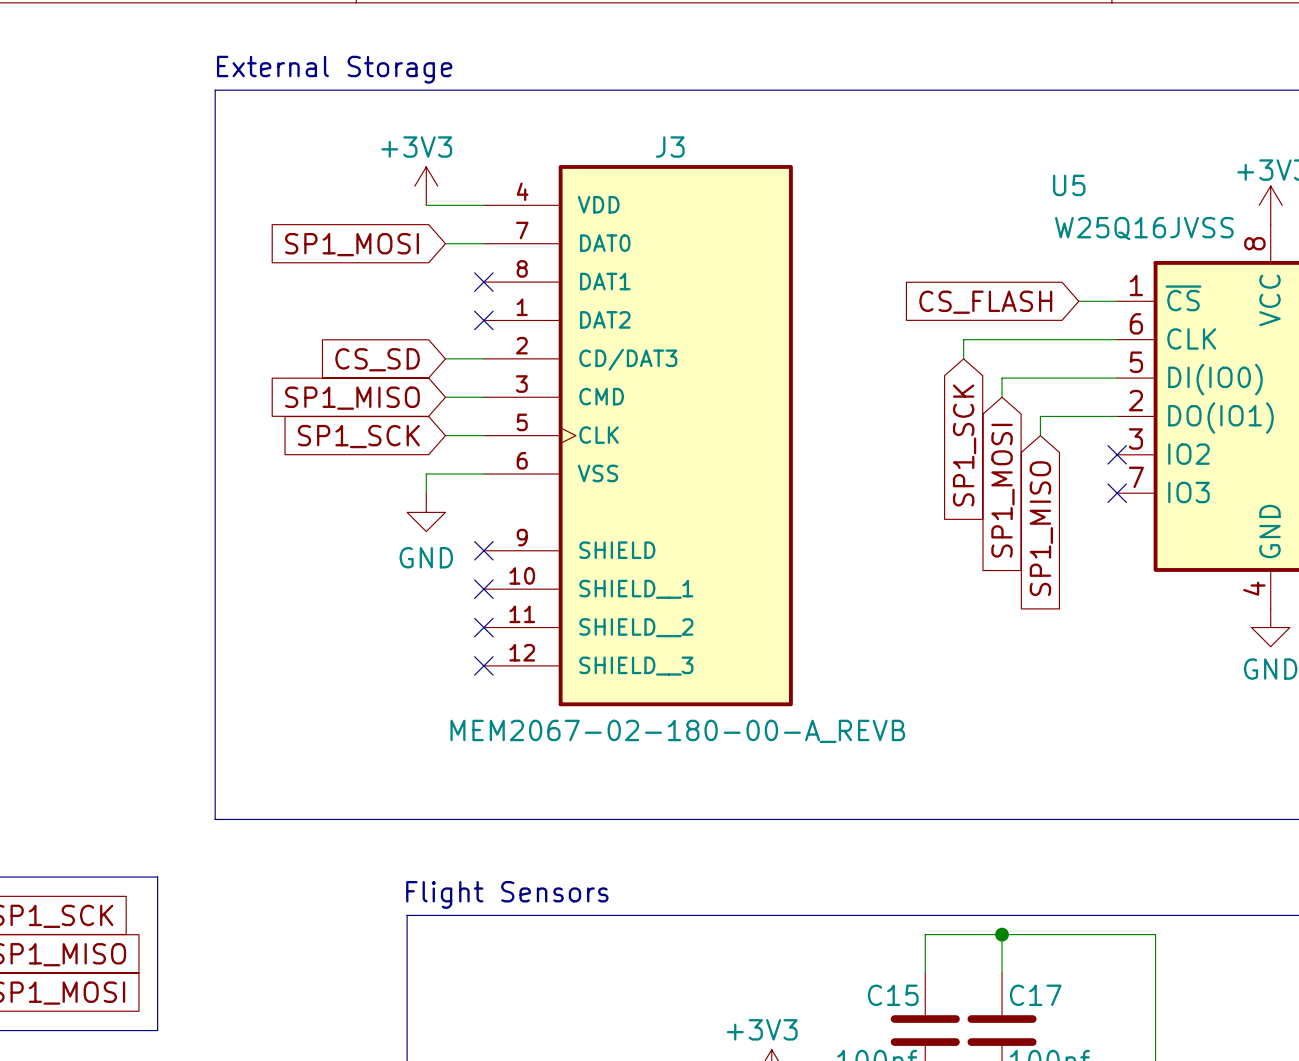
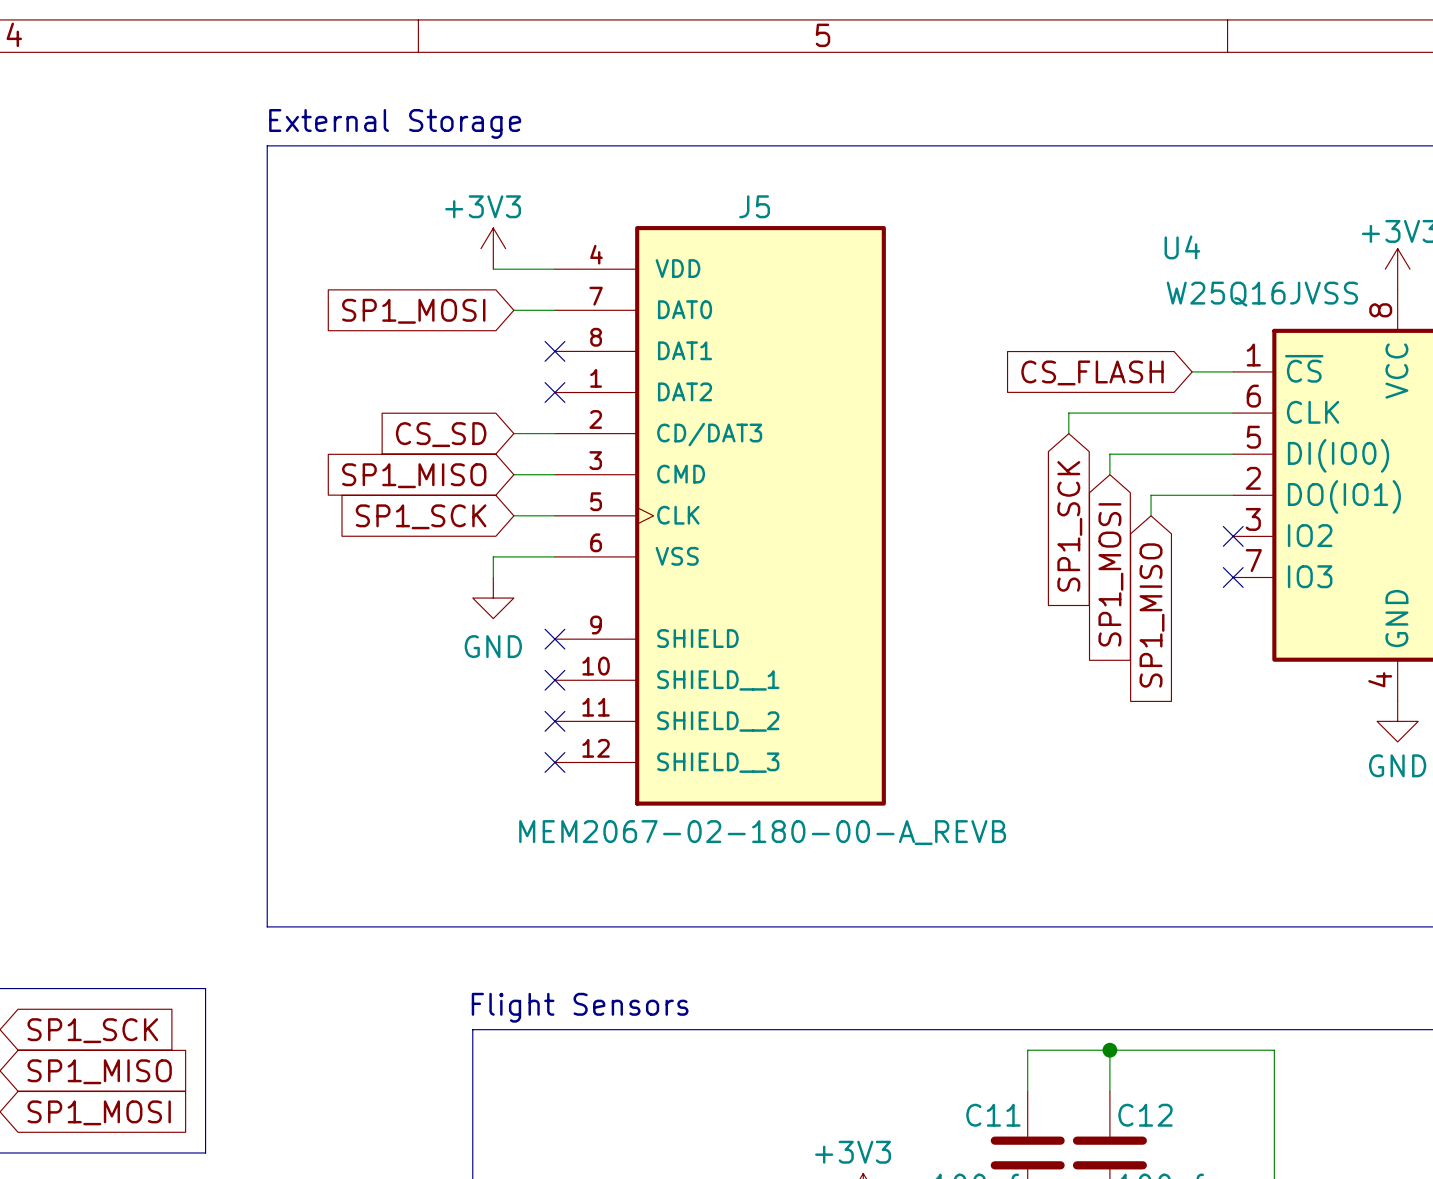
J3 name: J3 (670, 147) -> J5 (754, 206)
U5 name: U5 (1069, 185) -> U4 (1182, 247)
C15 name: C15 (893, 995) -> C11 (993, 1115)
C17 name: C17 (1035, 995) -> C12 (1145, 1115)

